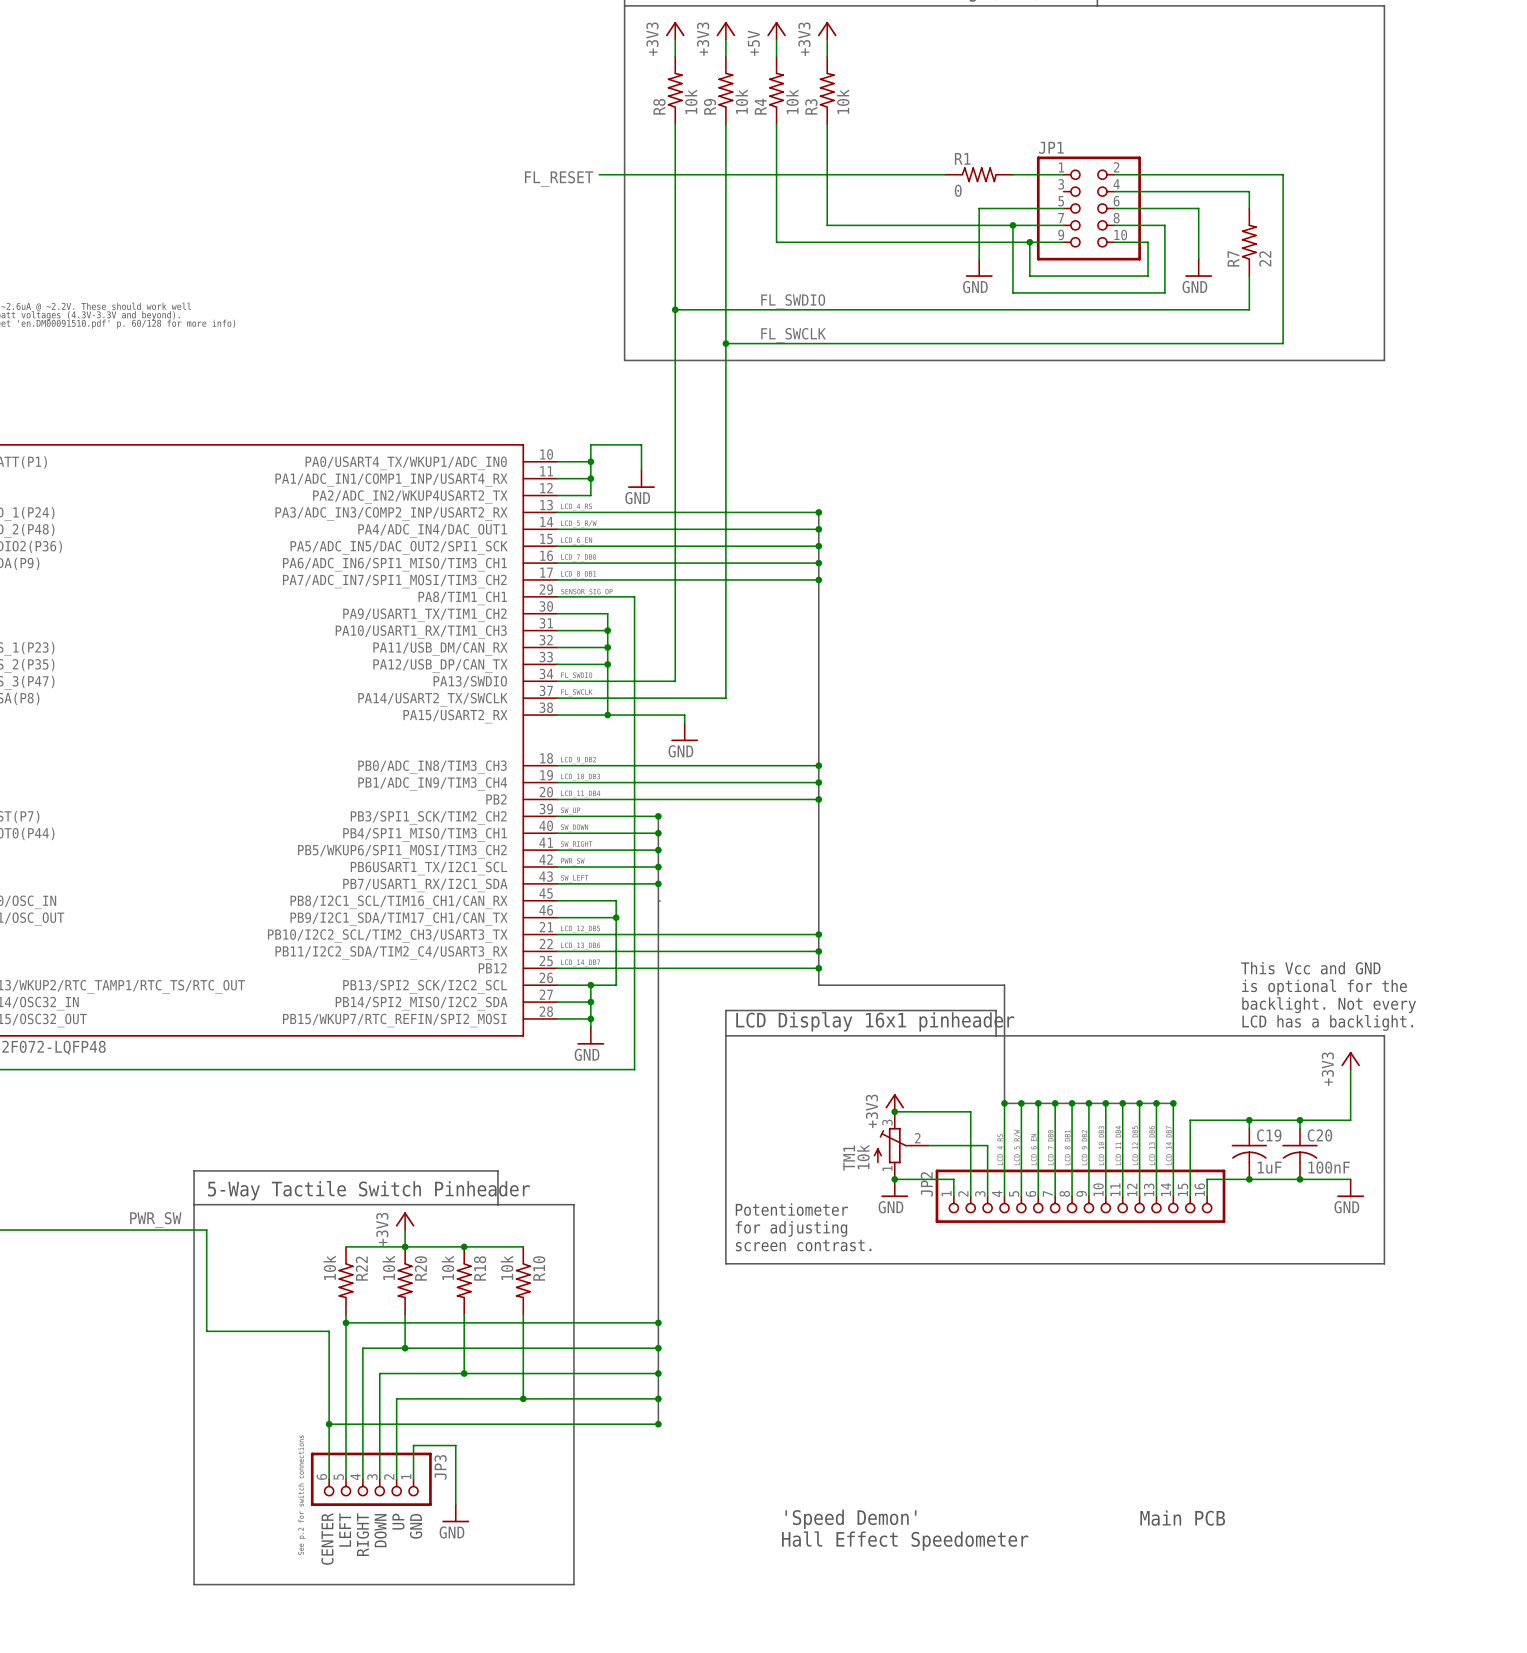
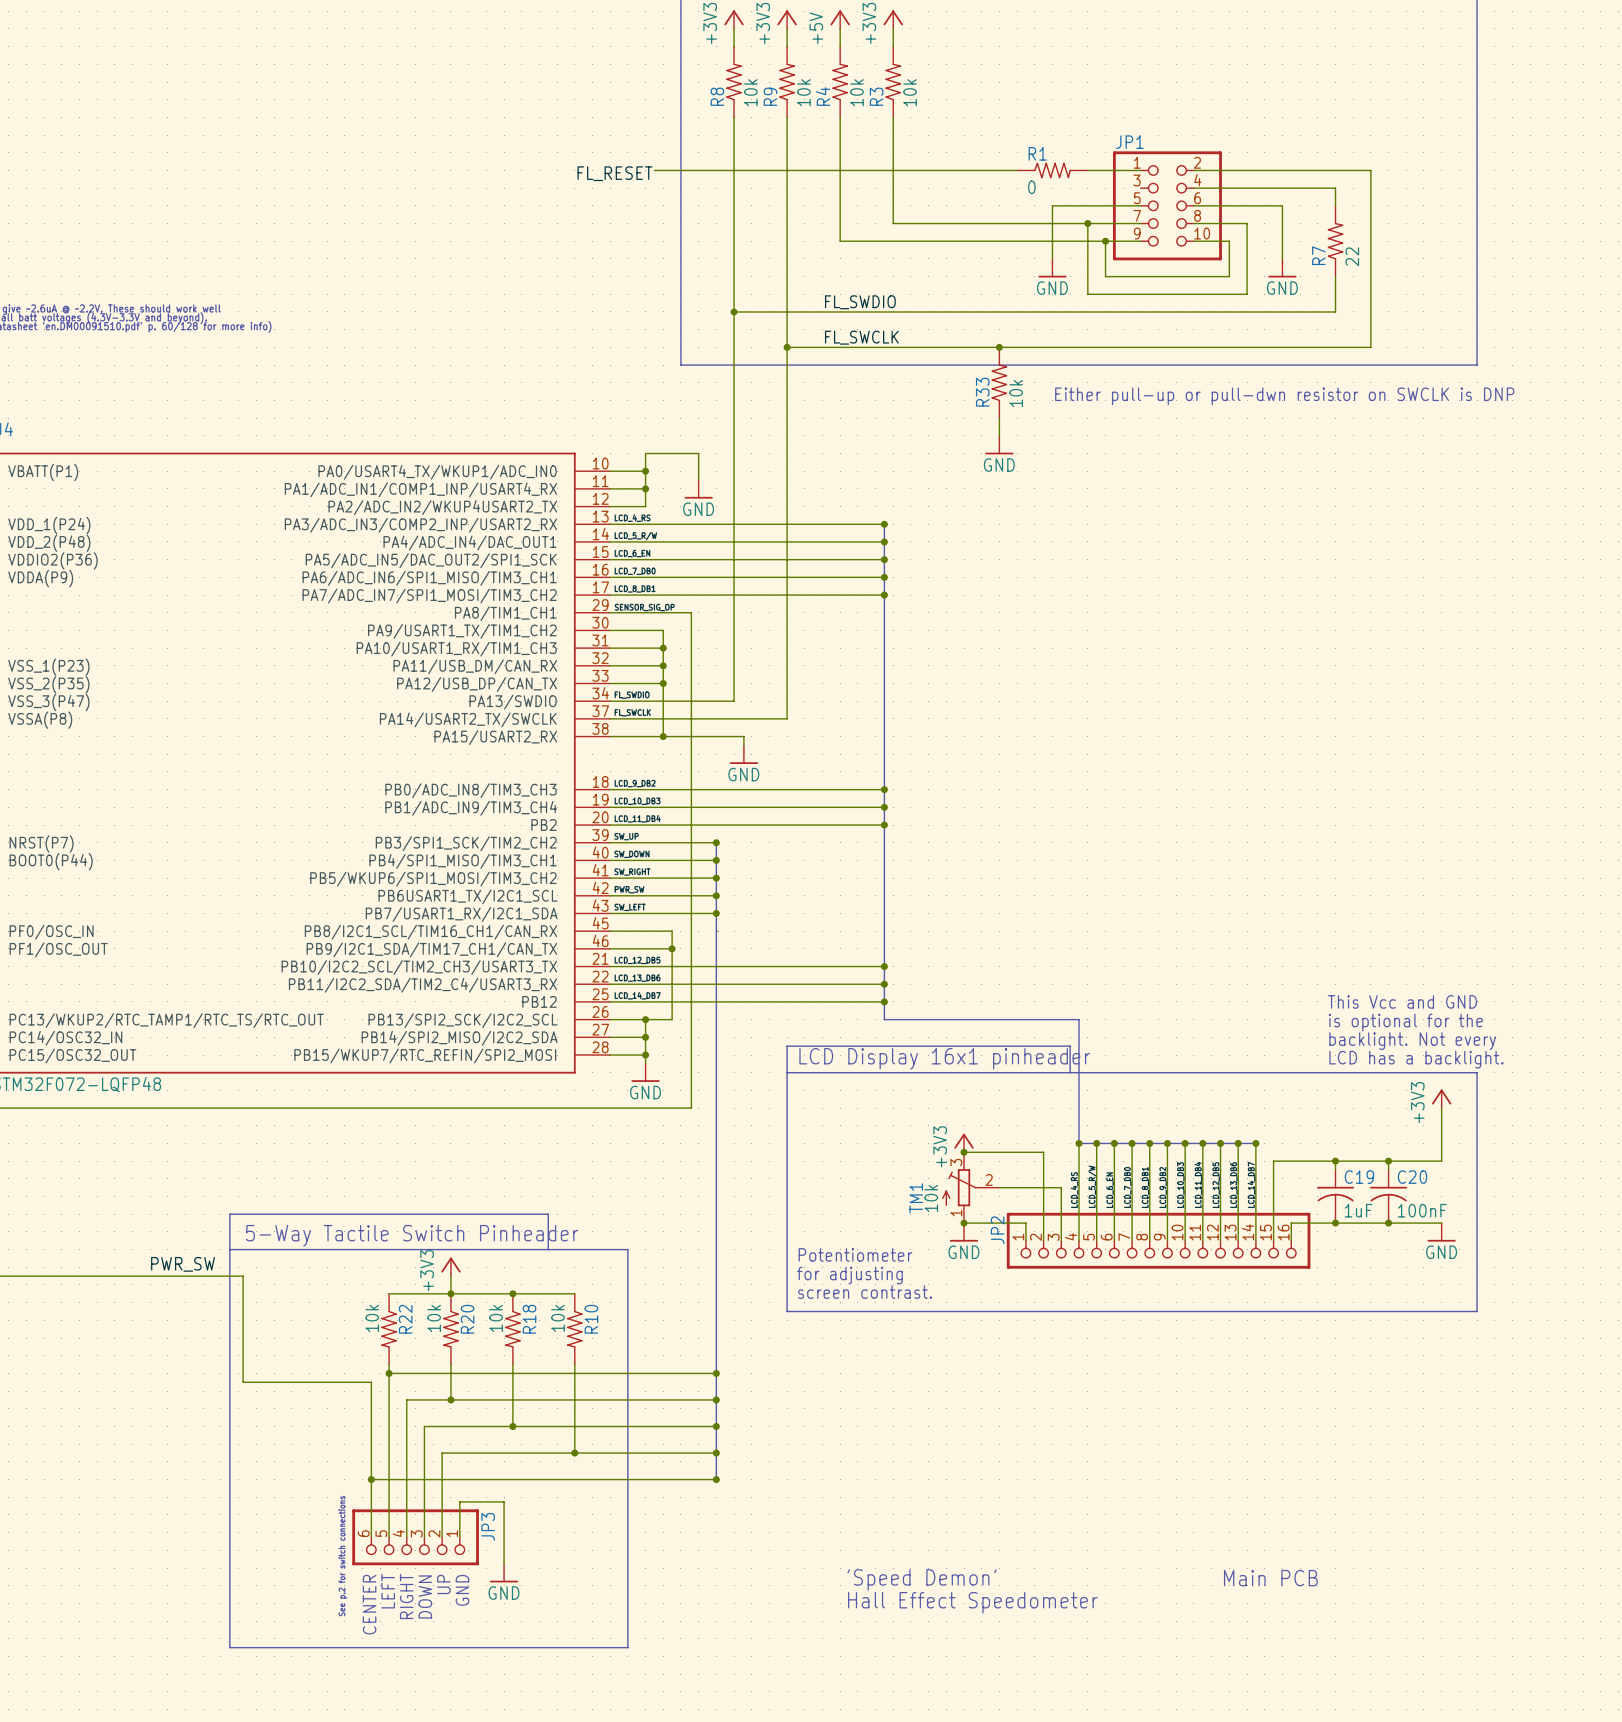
junction: none -> (999, 347)
R33: none -> 10k (999, 382)
text: none -> Either pull-up or pull-dwn resistor on SWCLK is DNP (1284, 396)
wire: none -> (999, 418) (999, 435)
power symbol: none -> GND (999, 445)

